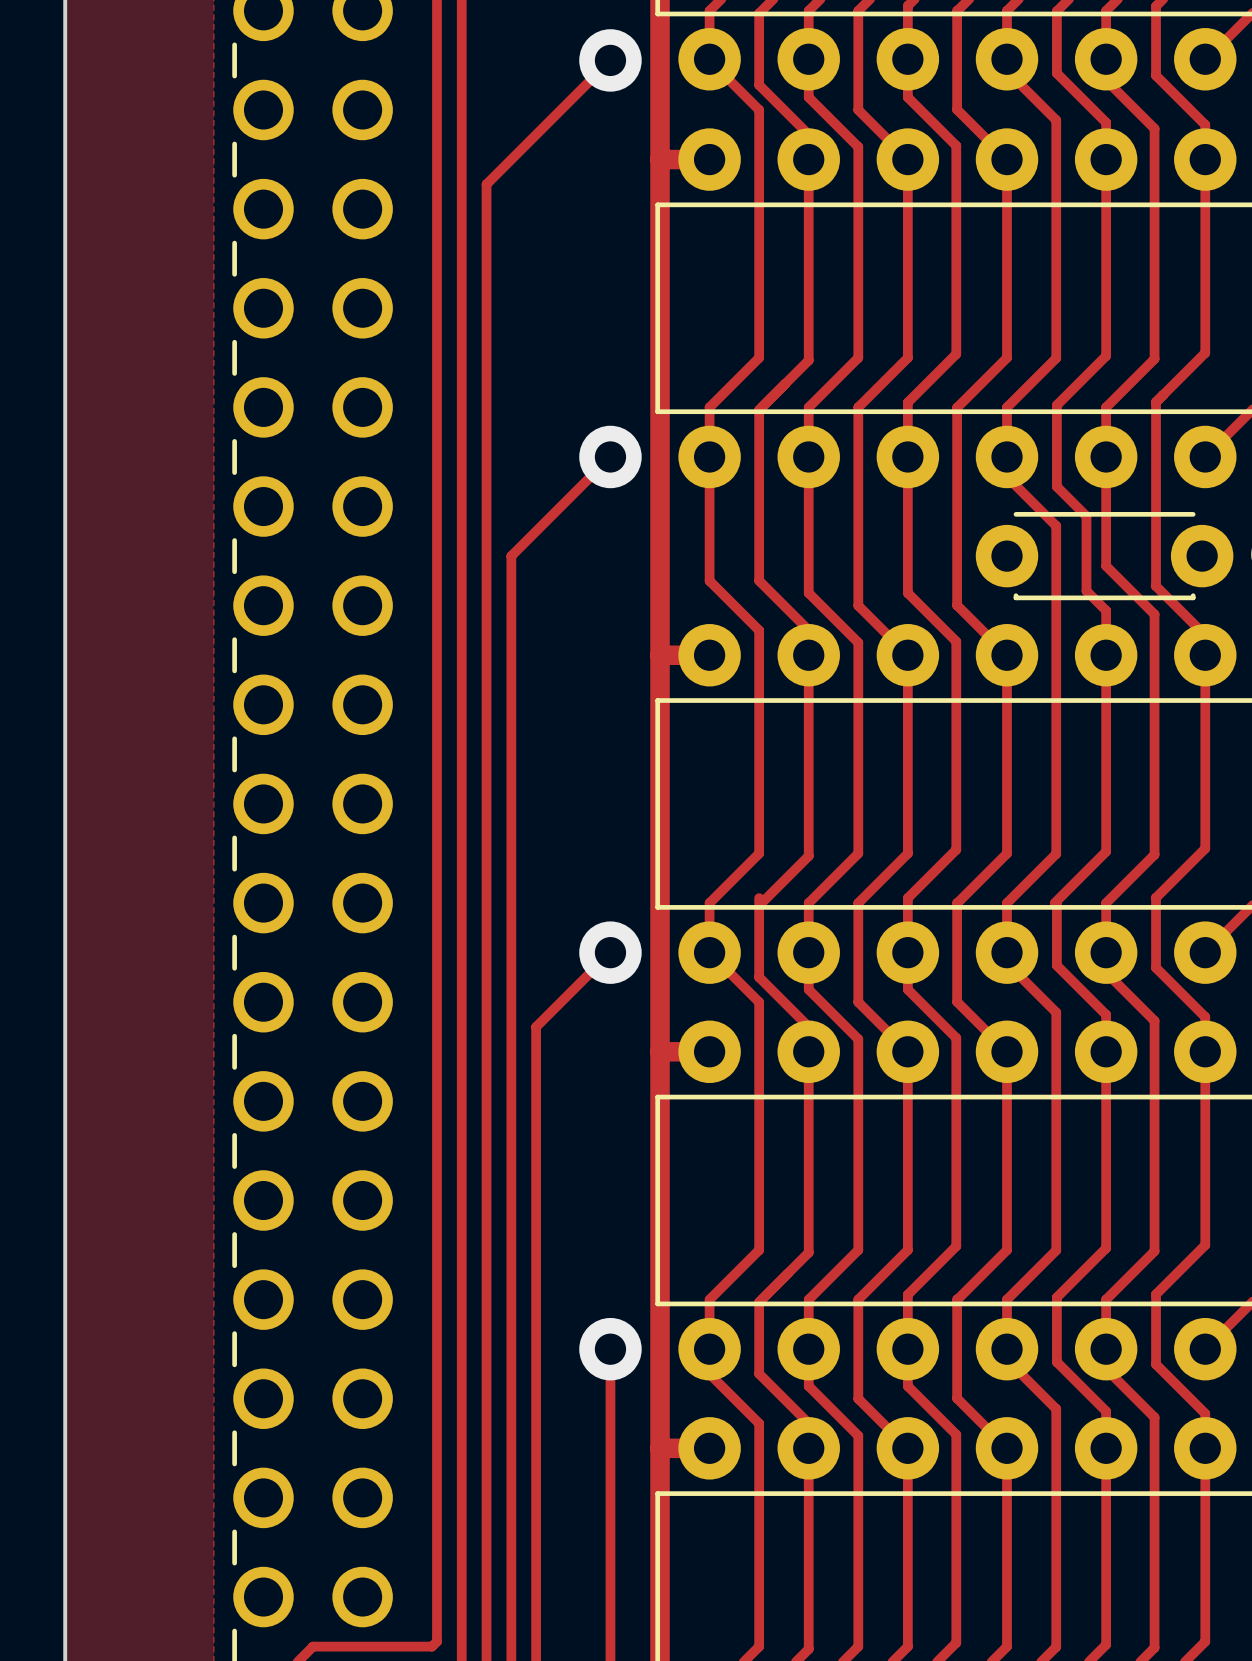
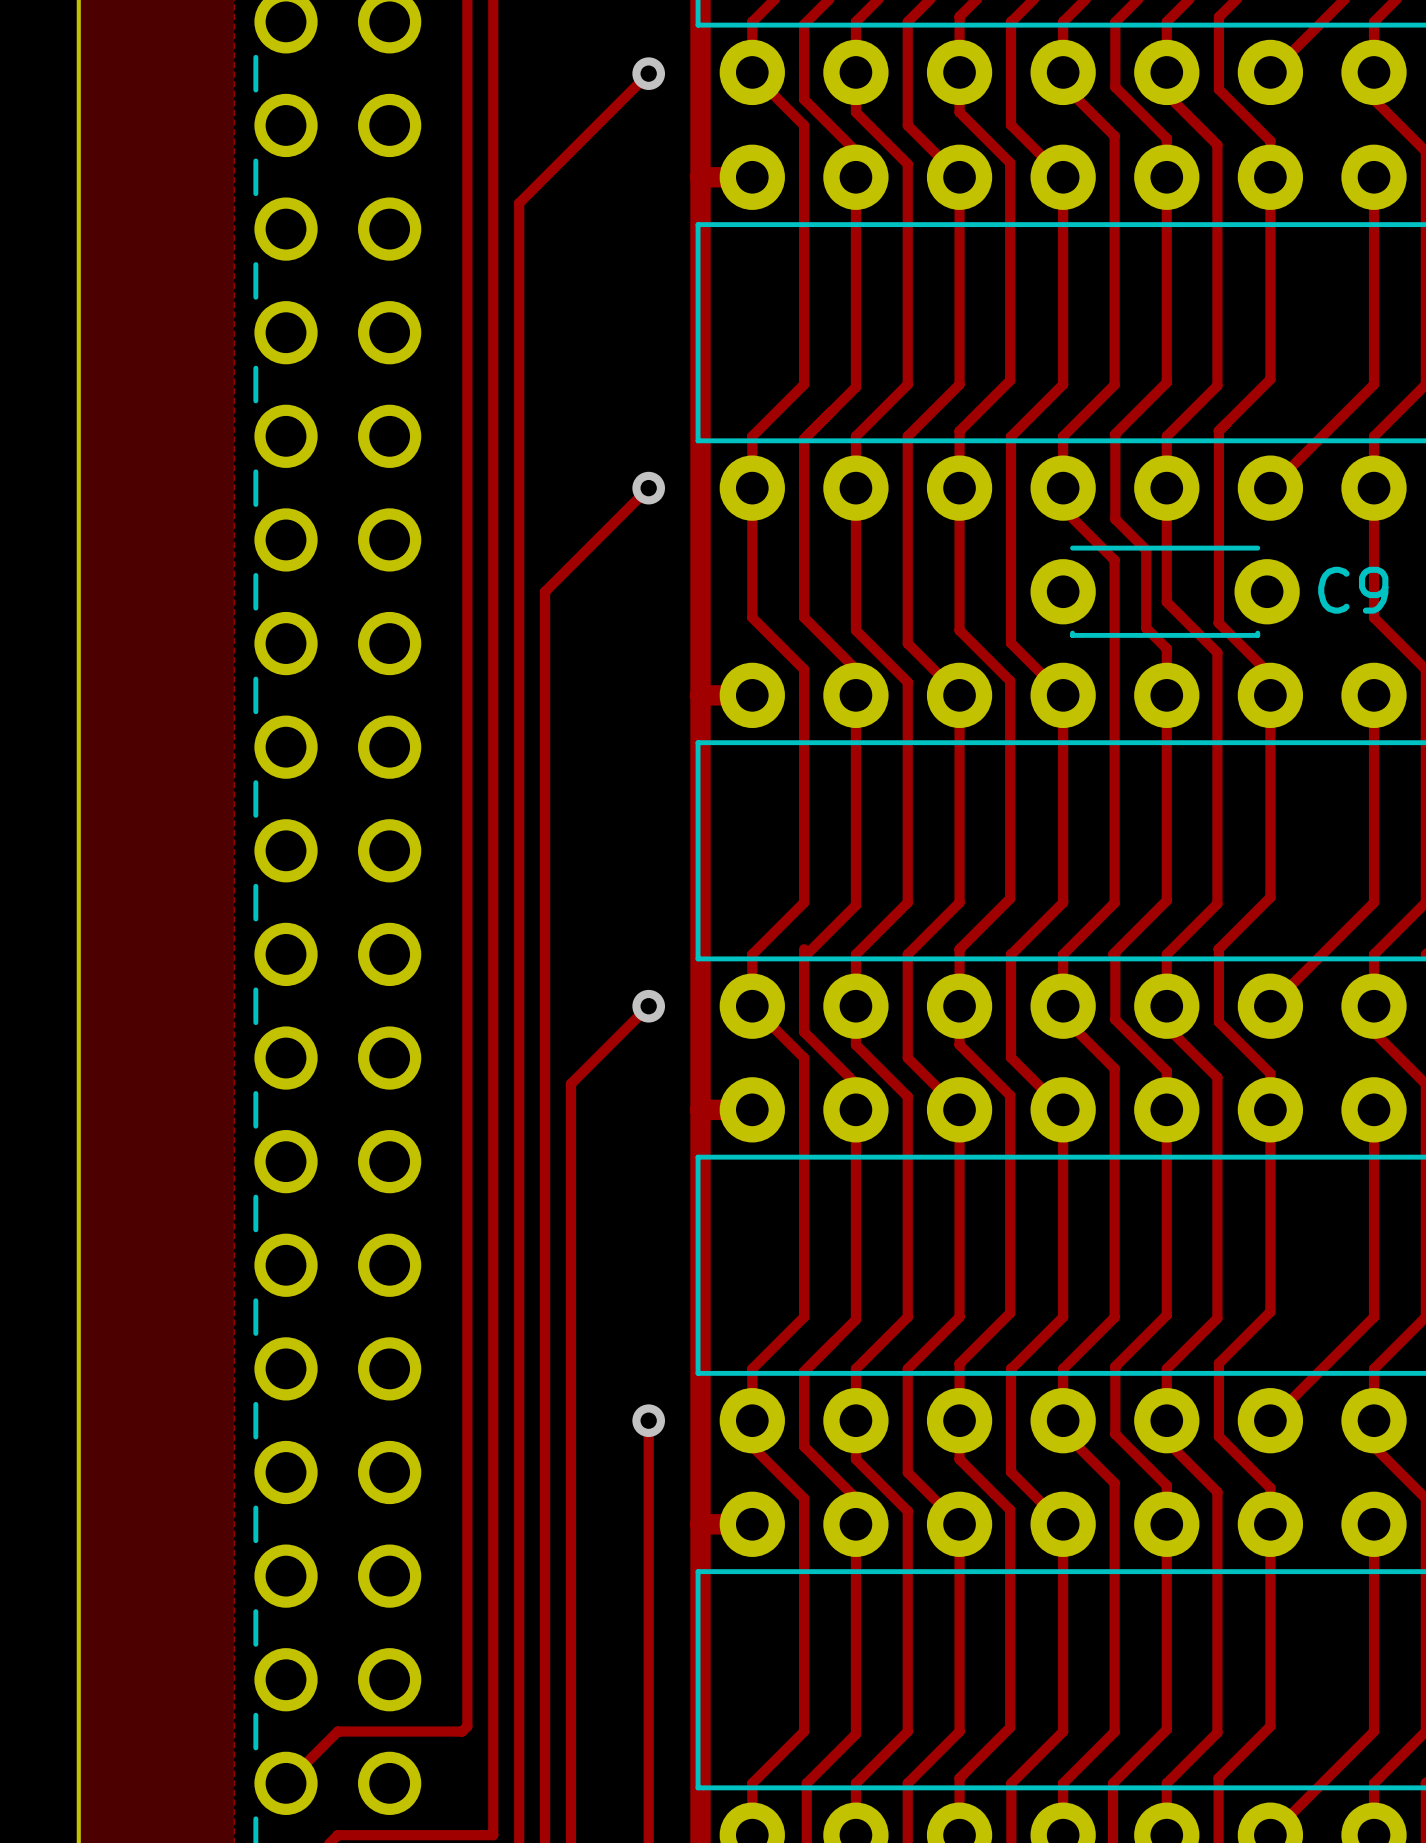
via size: [579, 29, 642, 92] -> [632, 57, 666, 90]
via size: [579, 425, 642, 489] -> [632, 471, 666, 505]
via size: [579, 921, 642, 984] -> [632, 989, 666, 1023]
via size: [579, 1317, 642, 1381] -> [632, 1404, 666, 1438]

